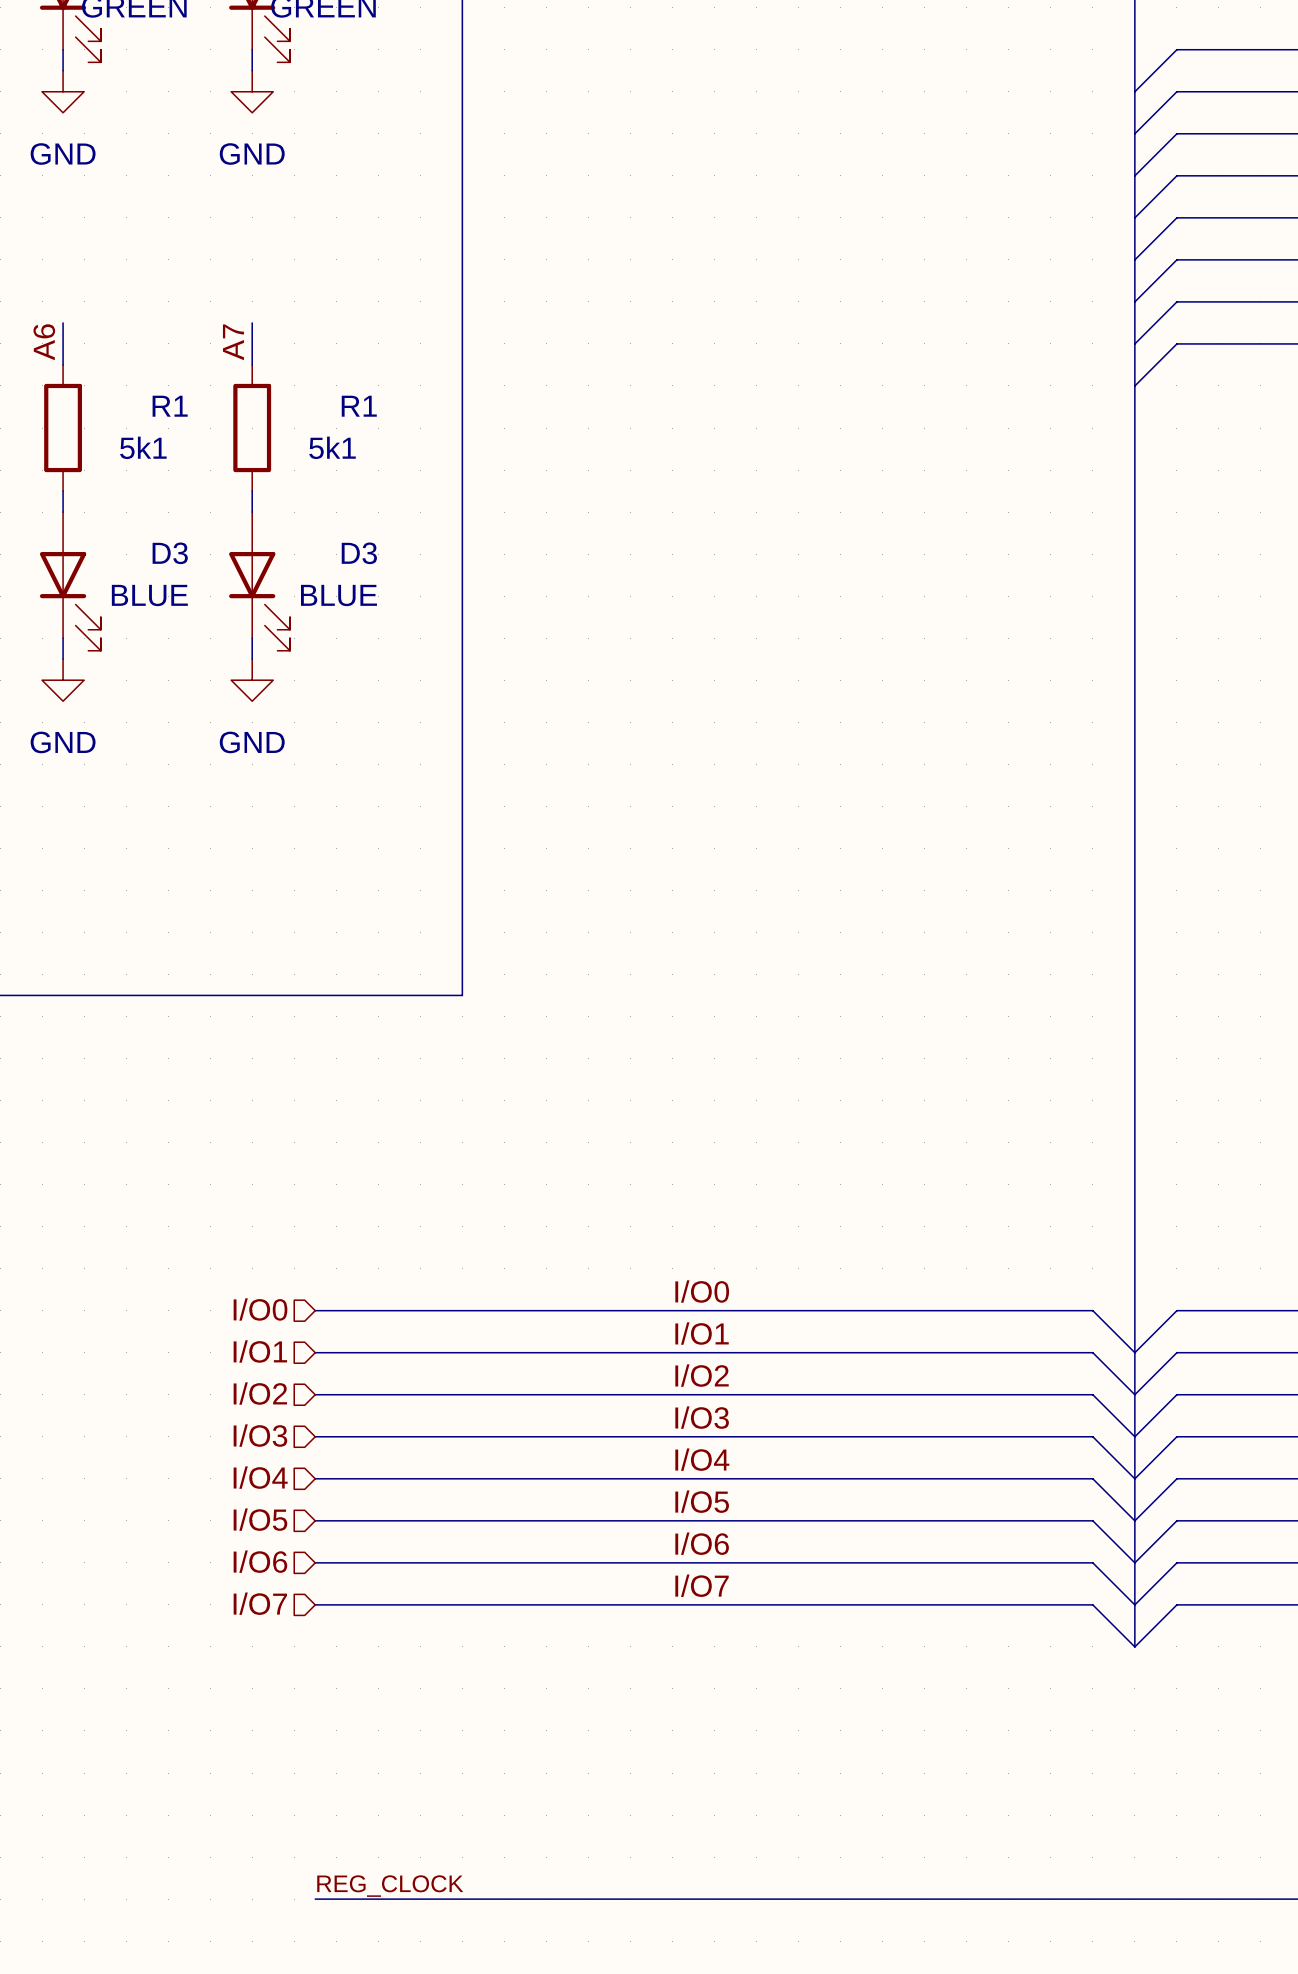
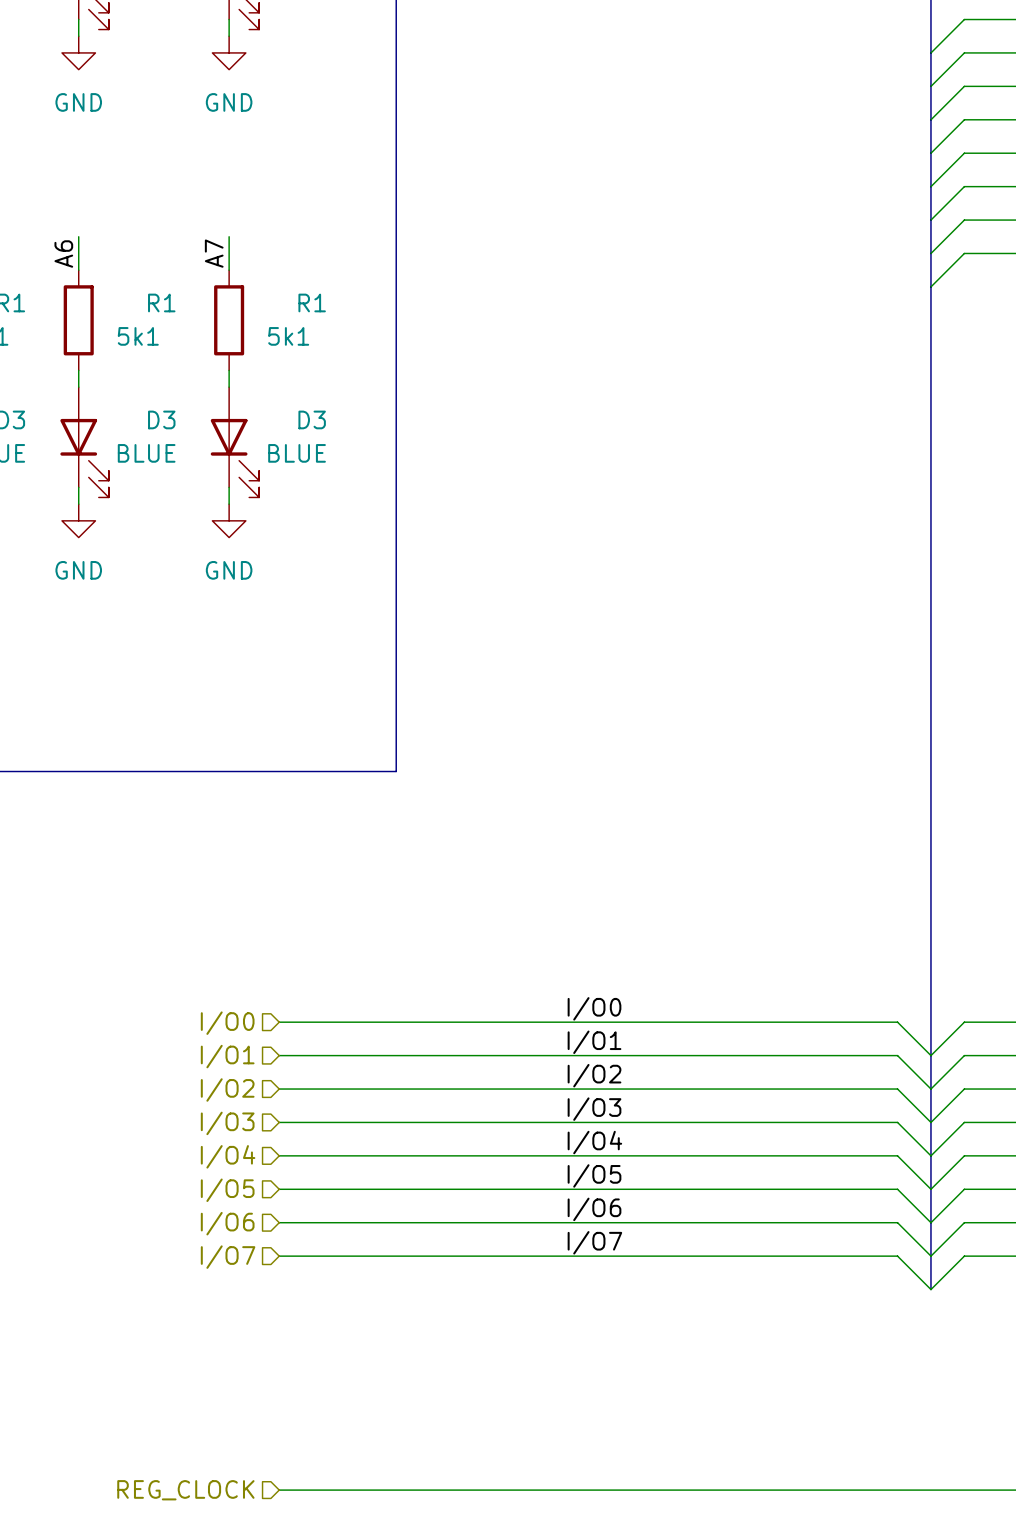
label: REG_CLOCK (390, 1886) -> none
hierarchical label: none -> REG_CLOCK (185, 1490)

